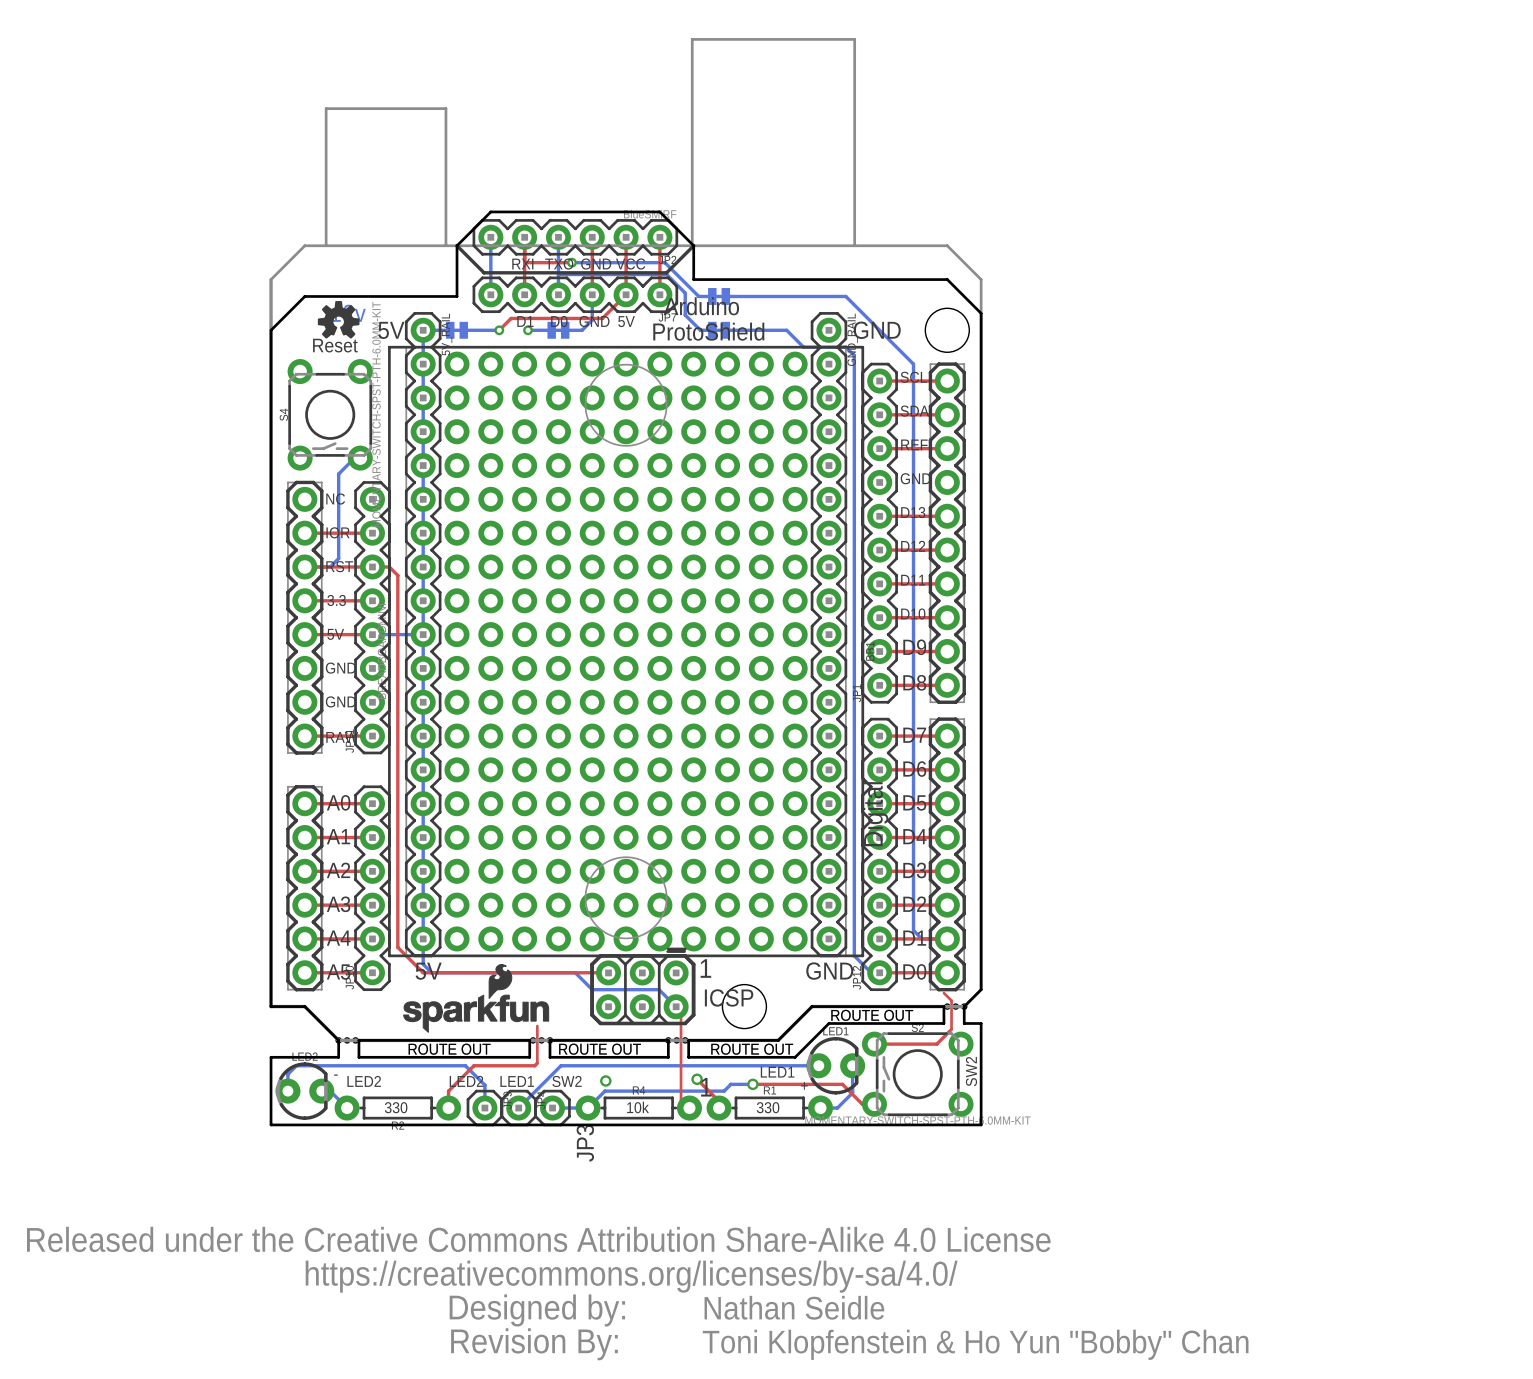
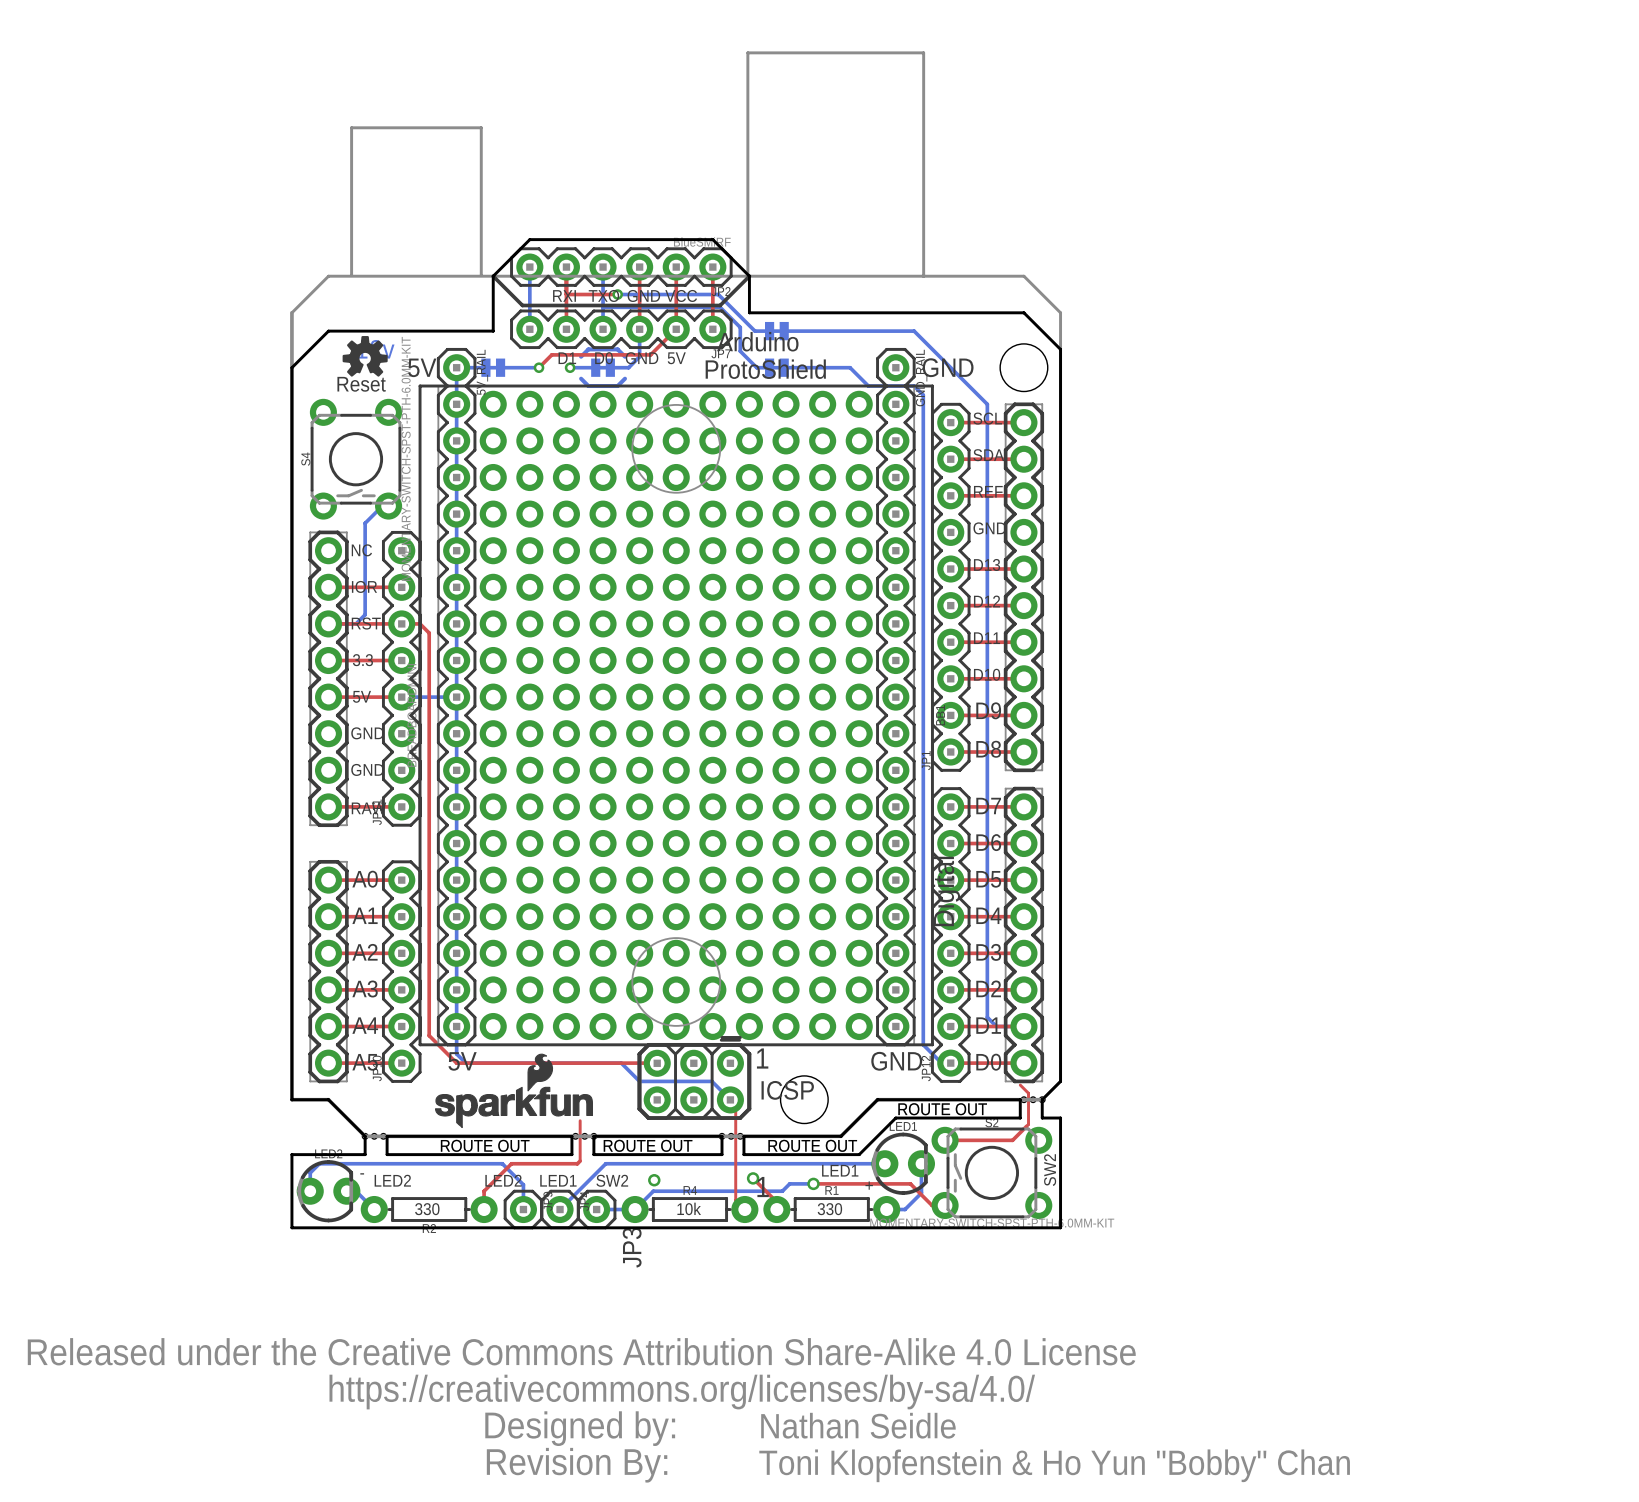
bottom track: none -> (581, 356) (588, 349) (617, 349) (625, 356)
bottom track: none -> (581, 378) (588, 386) (617, 386) (625, 378)

